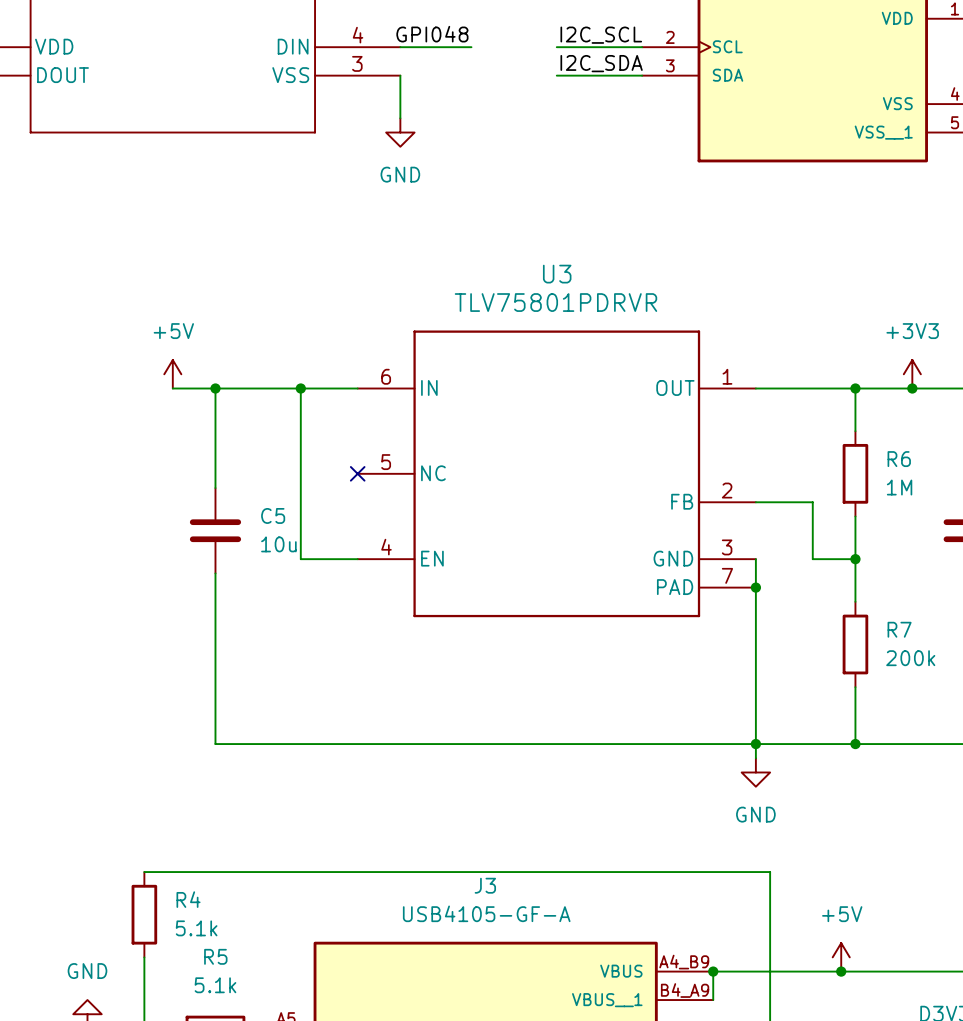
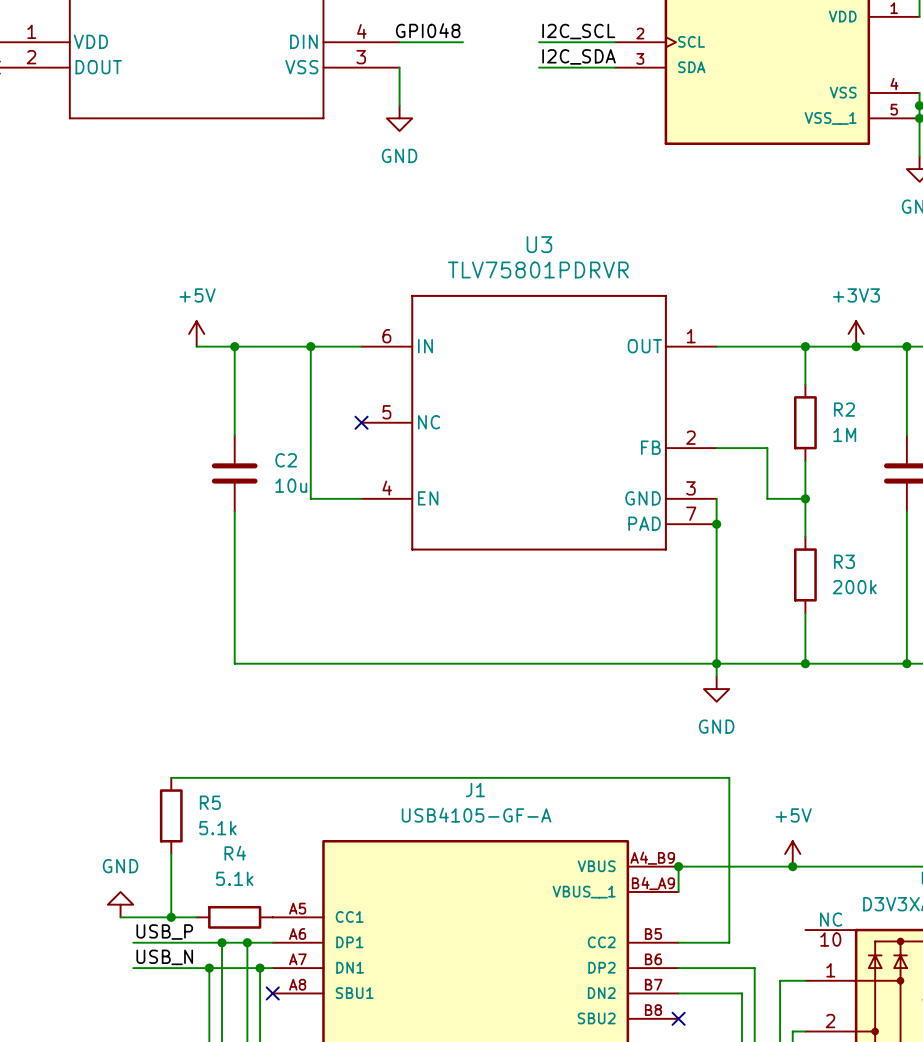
R6 name: R6 (899, 459) -> R2 (844, 409)
C5 name: C5 (273, 515) -> C2 (286, 460)
R7 name: R7 (899, 629) -> R3 (844, 561)
J3 name: J3 (485, 885) -> J1 (475, 790)
R4 name: R4 (188, 899) -> R5 (210, 802)
R5 name: R5 (215, 956) -> R4 (235, 853)

